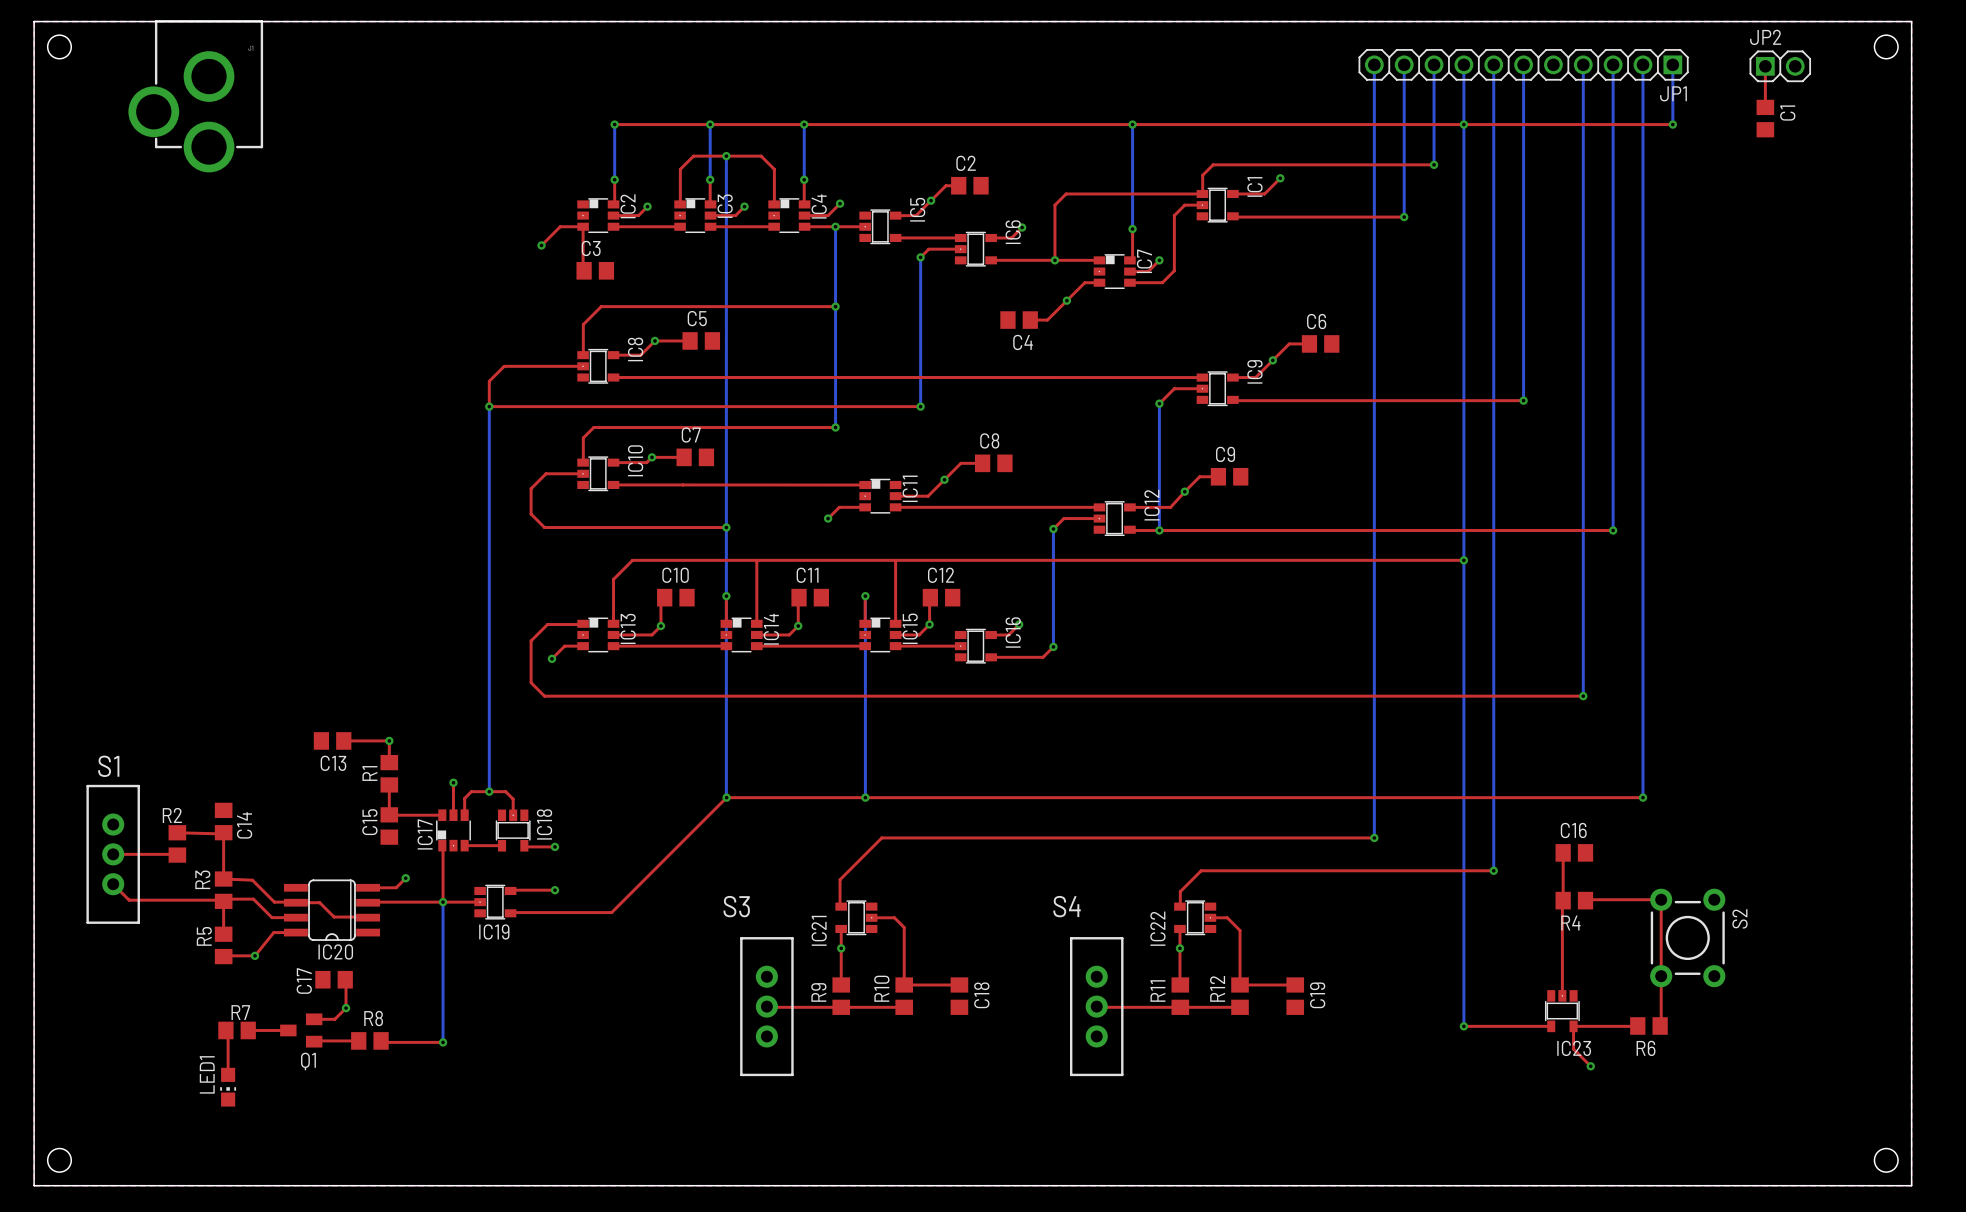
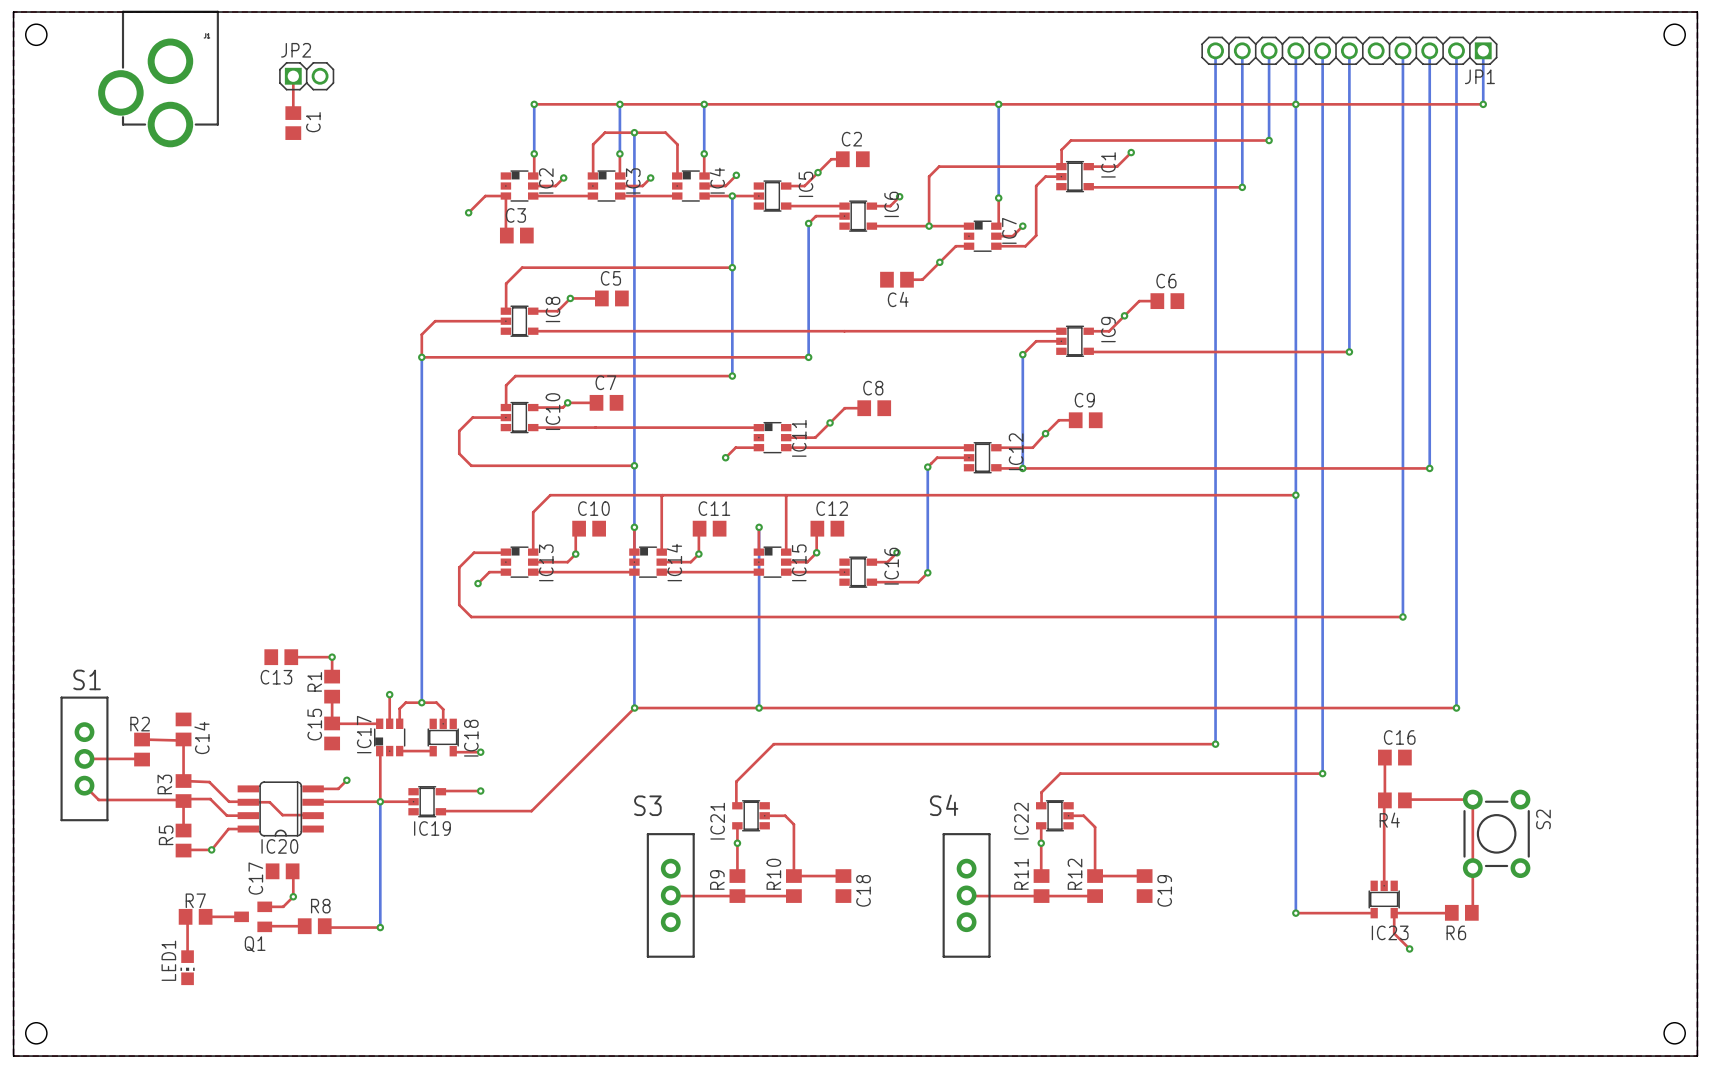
top track: (1765, 66) (1765, 107) -> none
JP2 position: (1780, 66) -> (306, 76)
top track: none -> (293, 76) (293, 113)
C1 position: (1765, 118) -> (293, 123)

